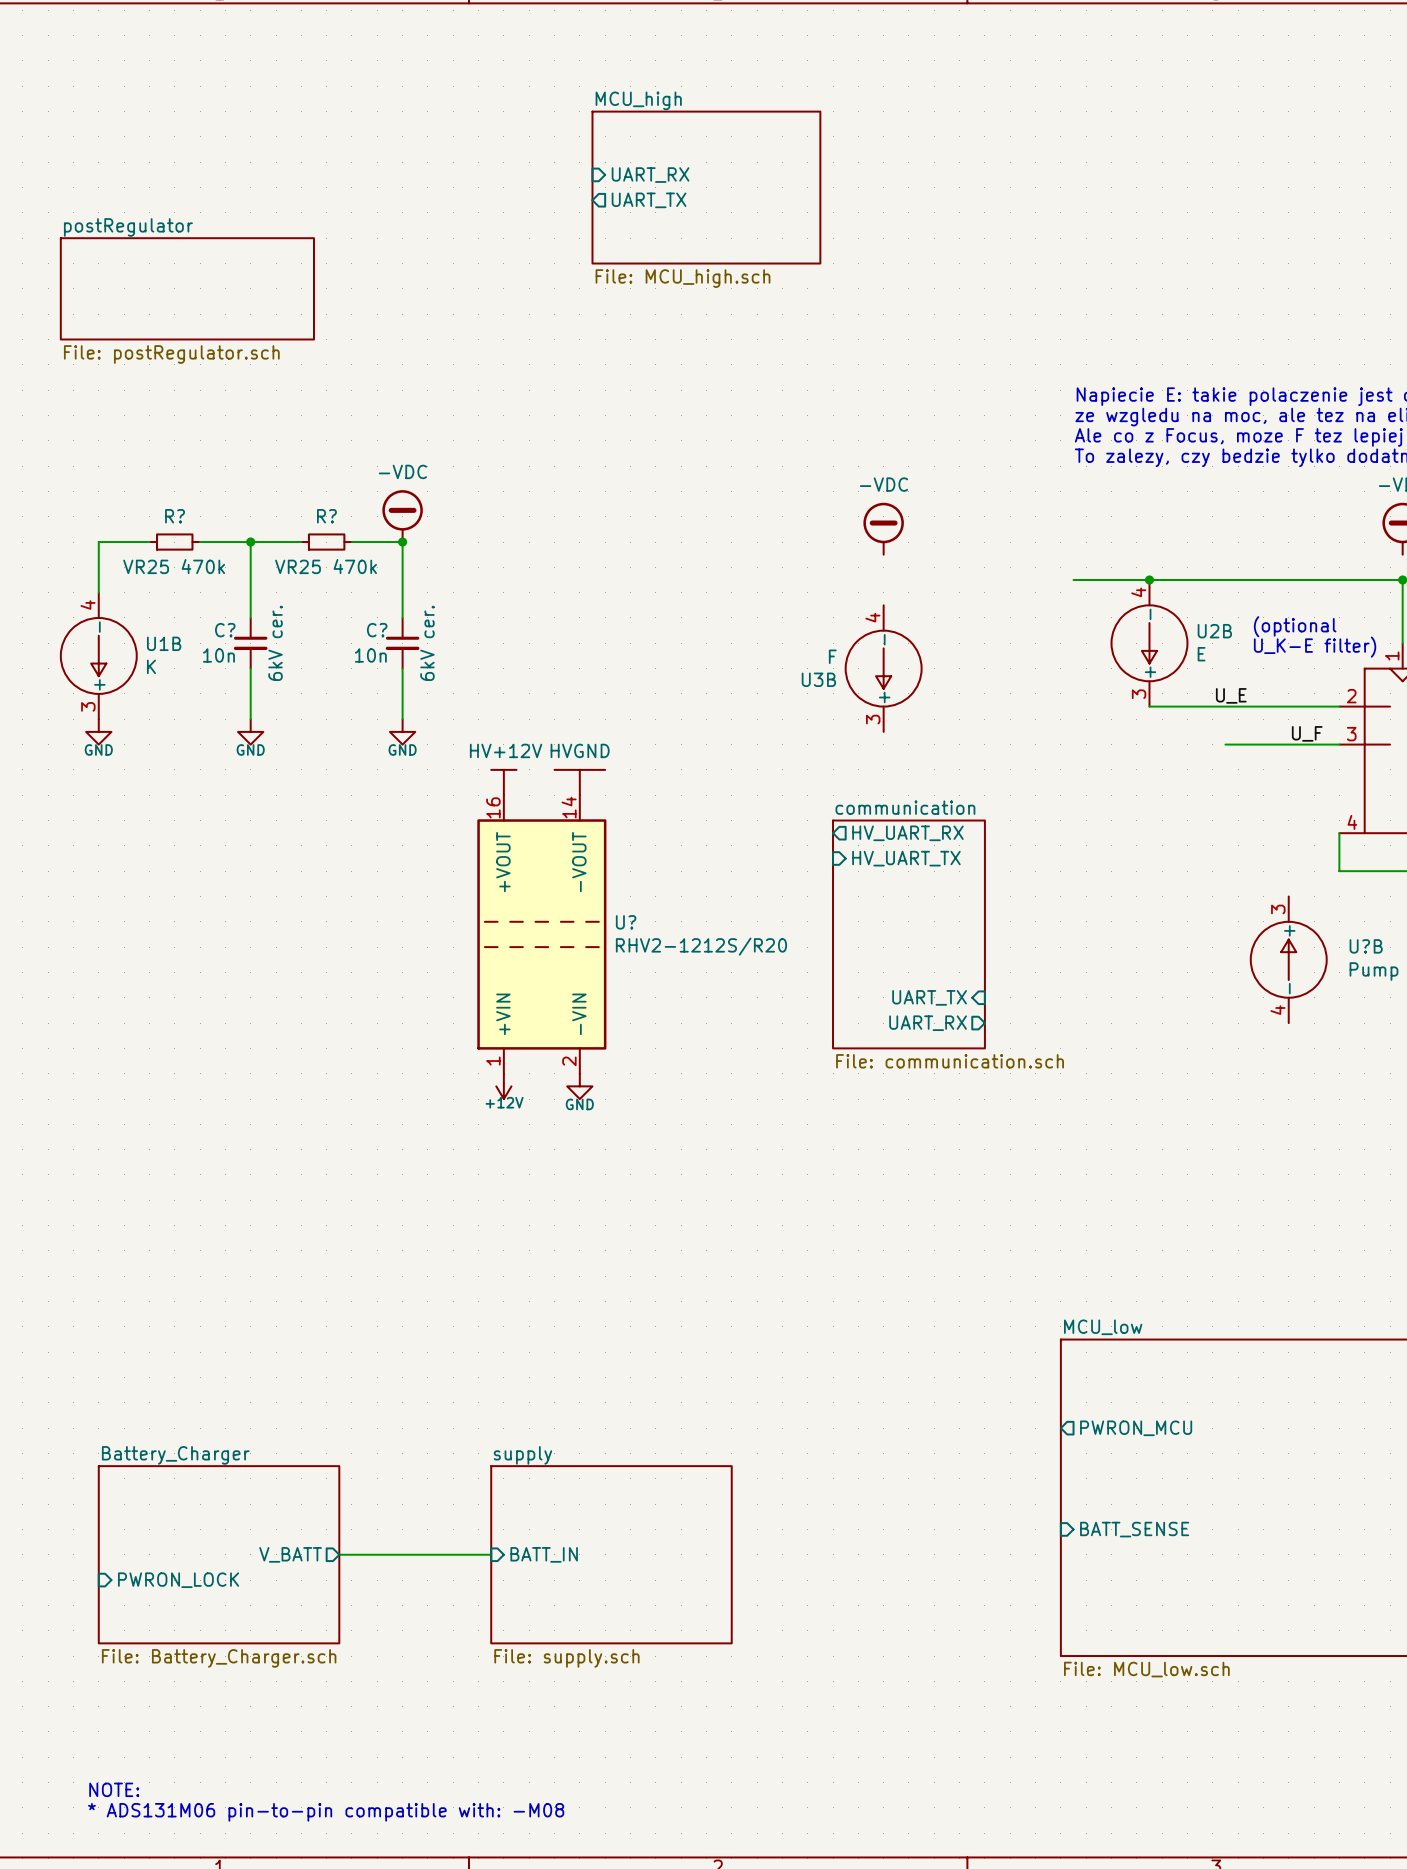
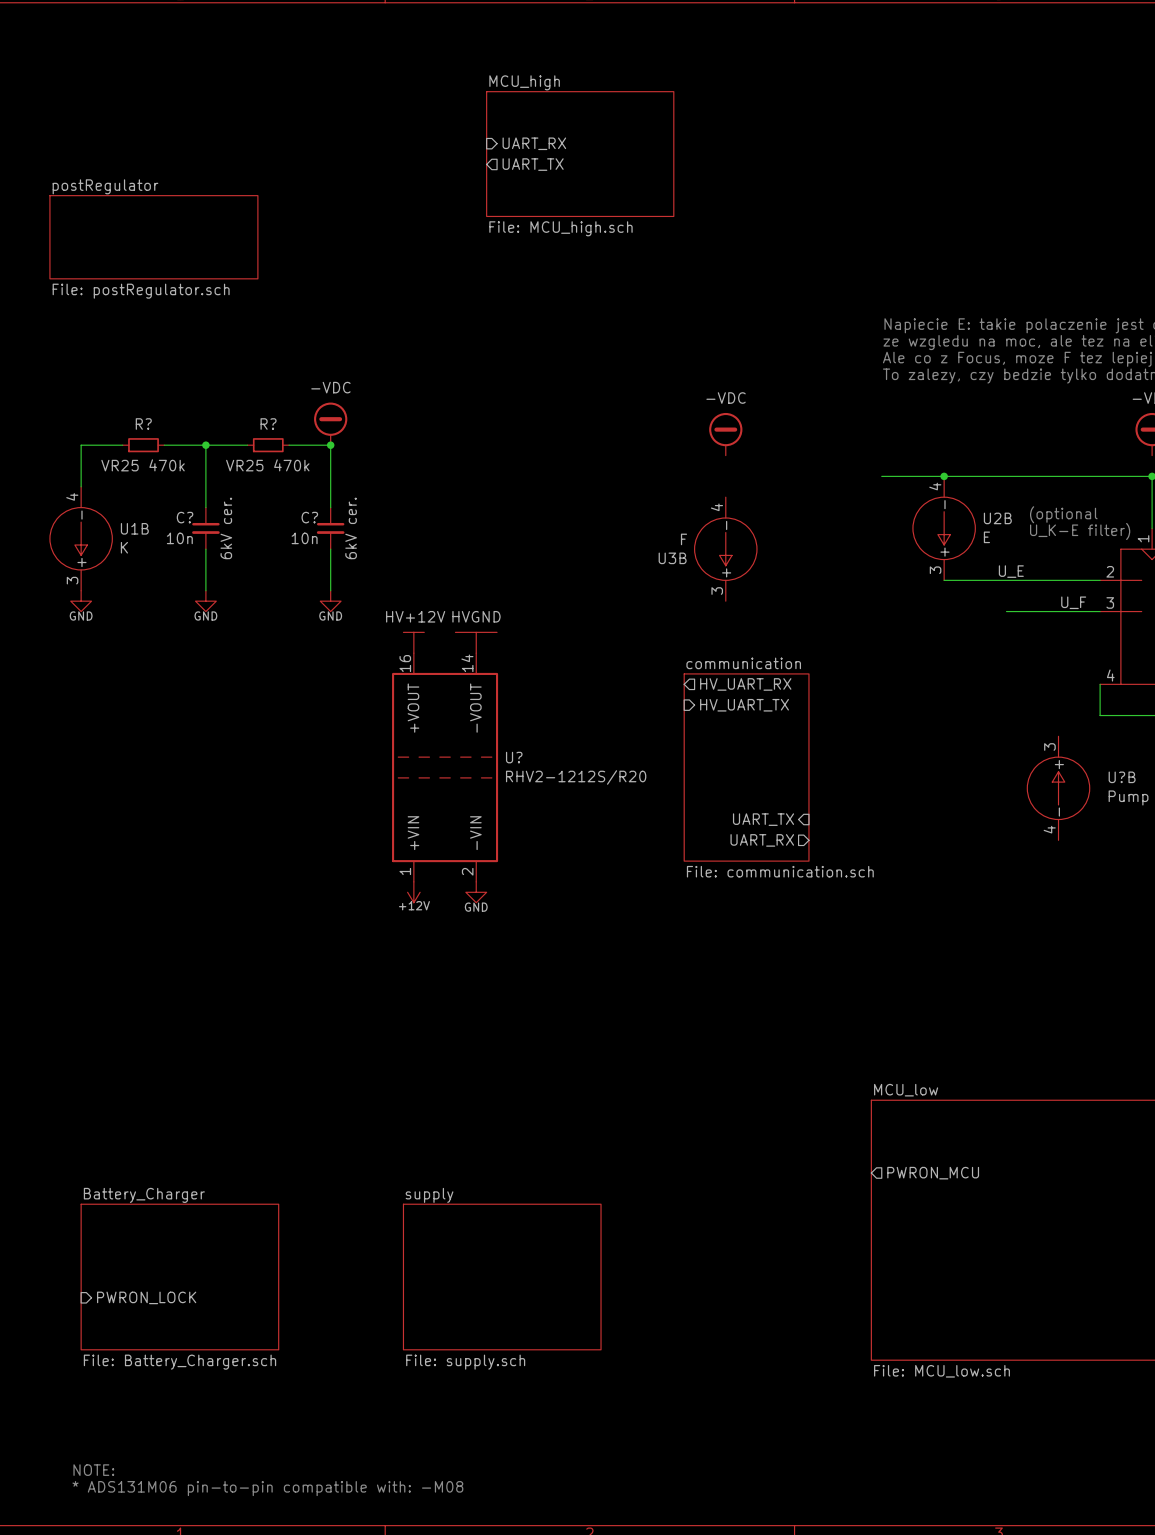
sheet pin: BATT_SENSE (1134, 1529) -> none
sheet pin: V_BATT (290, 1554) -> none
wire: (339, 1554) (491, 1554) -> none
sheet pin: BATT_IN (544, 1554) -> none

